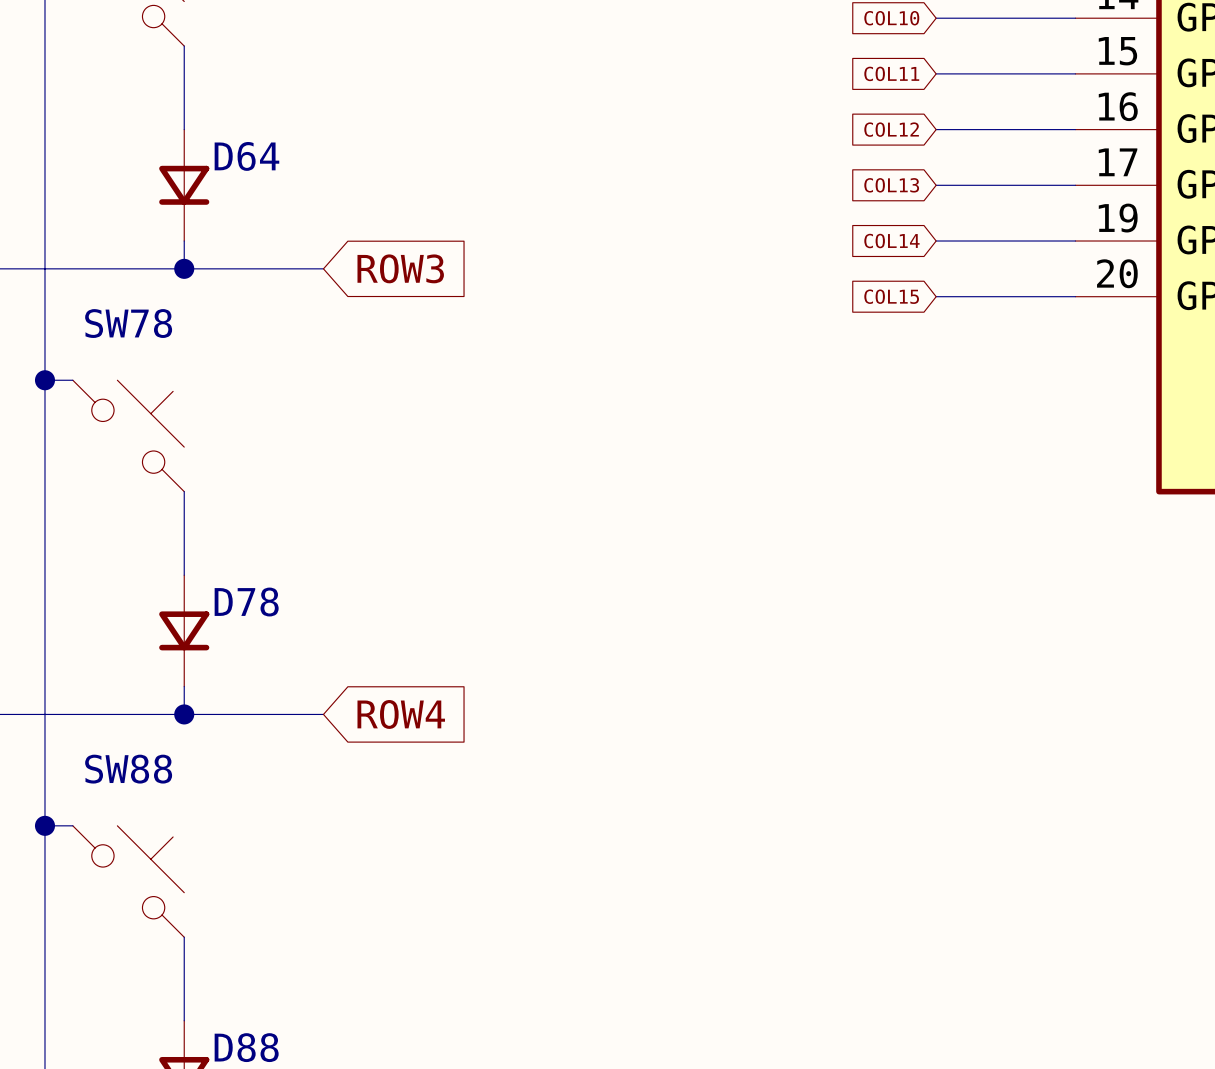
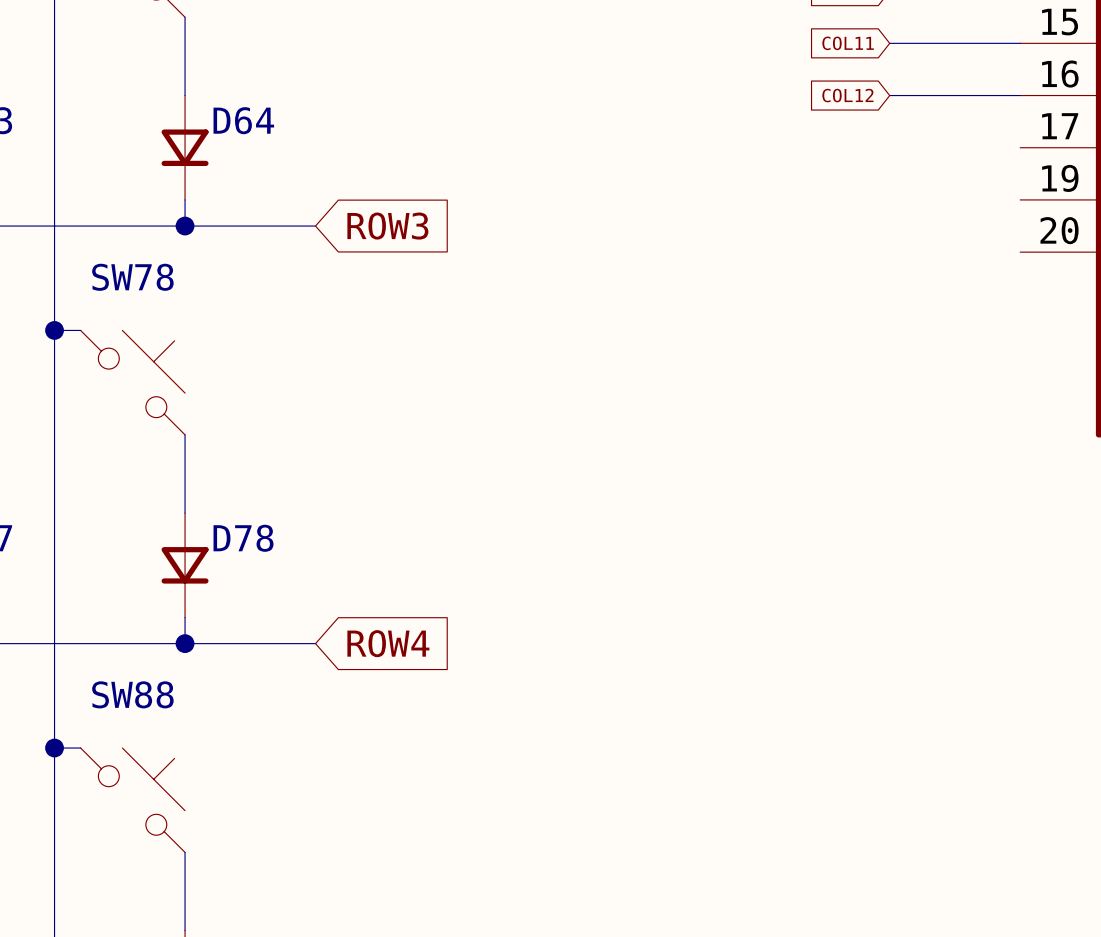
global label: COL13 (891, 185) -> none
wire: (936, 185) (1075, 185) -> none
global label: COL14 (891, 241) -> none
wire: (936, 241) (1075, 241) -> none
global label: COL15 (891, 296) -> none
wire: (936, 296) (1075, 296) -> none

